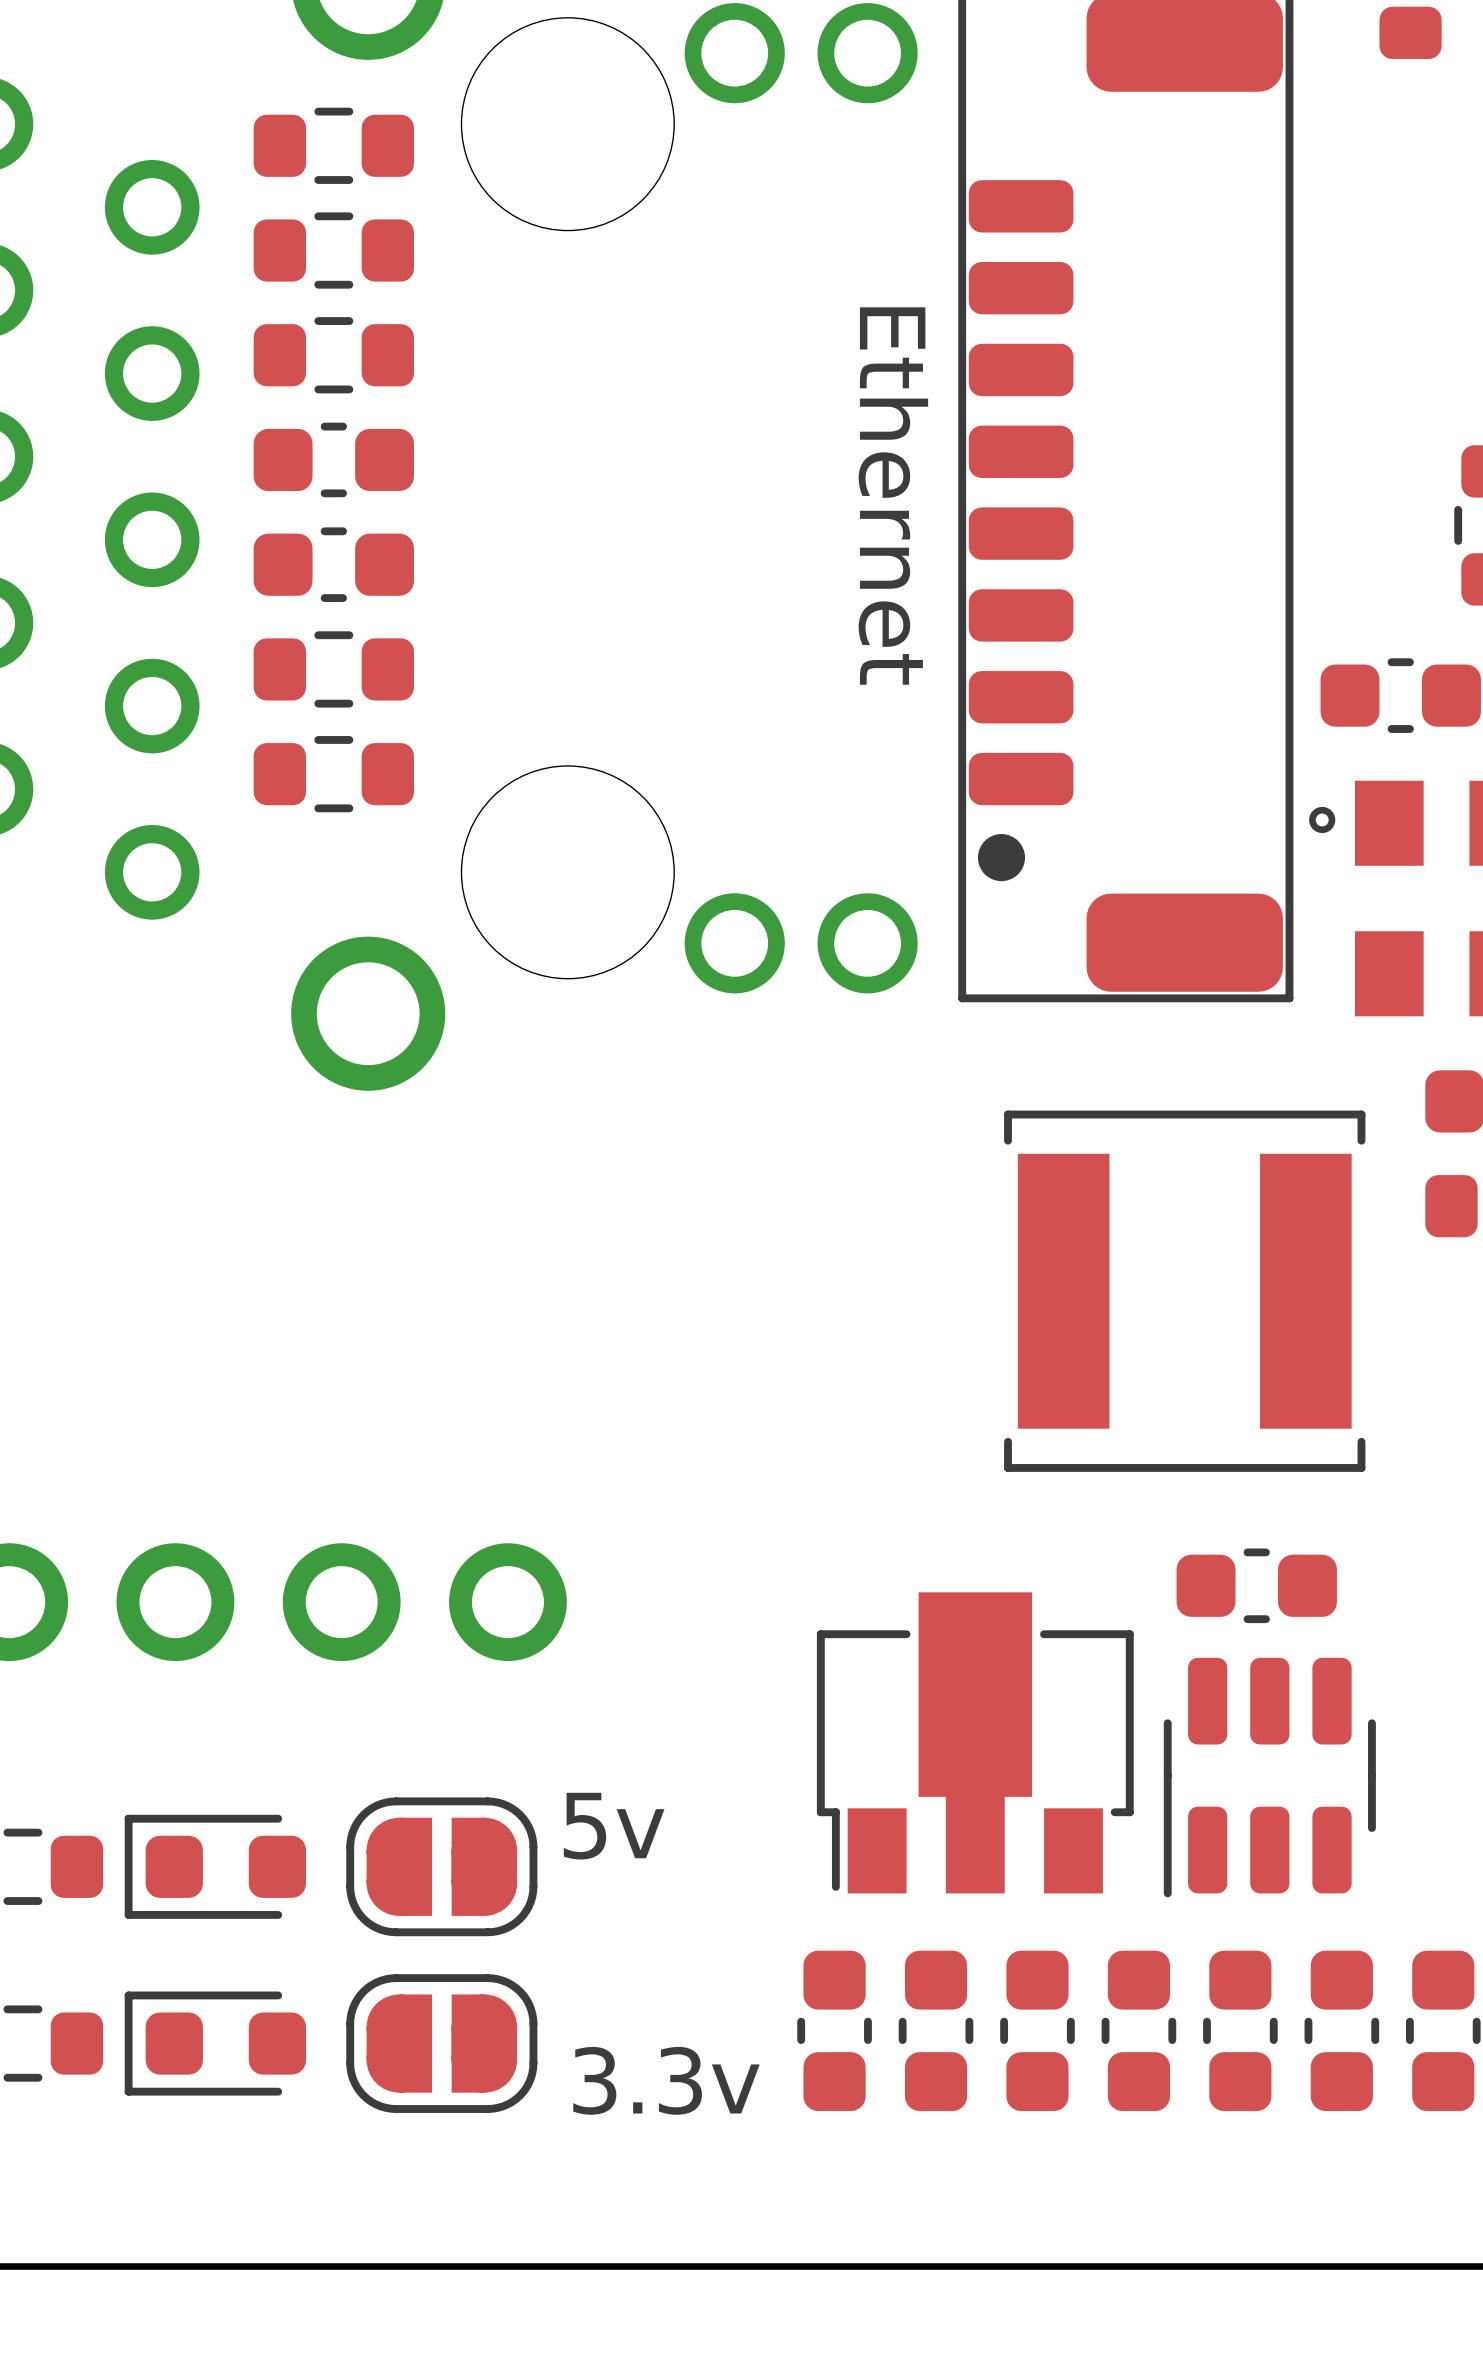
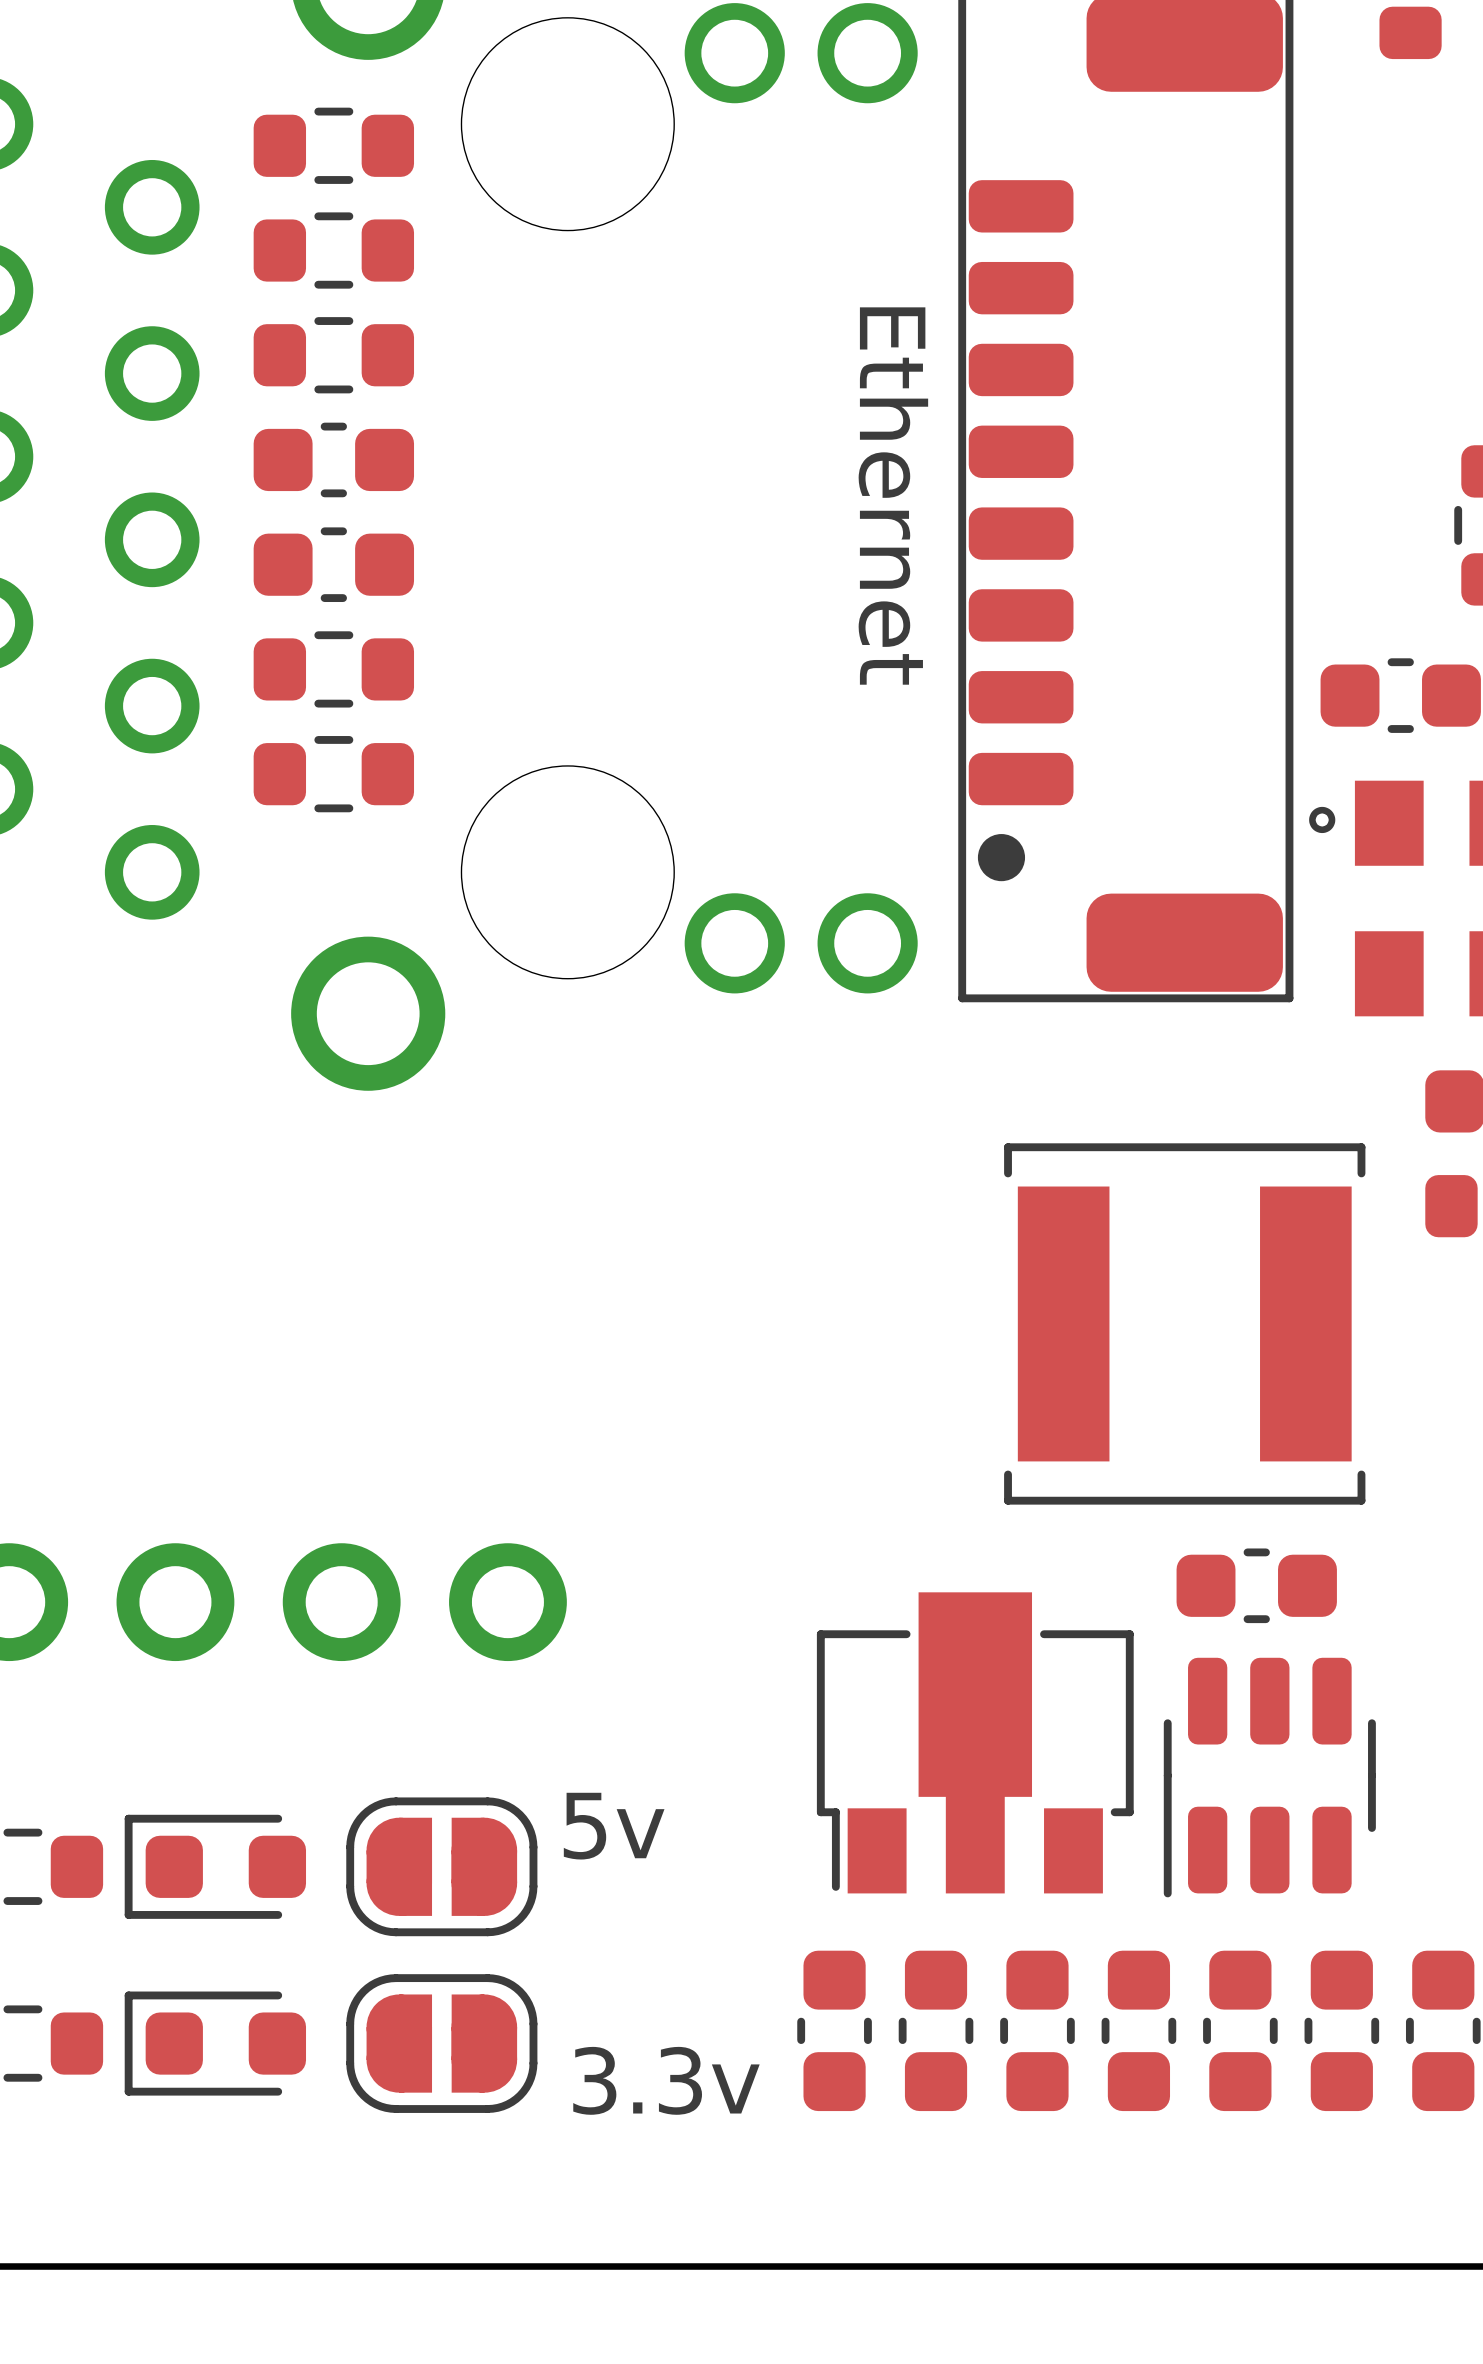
part position: (1184, 1291) -> (1184, 1323)

